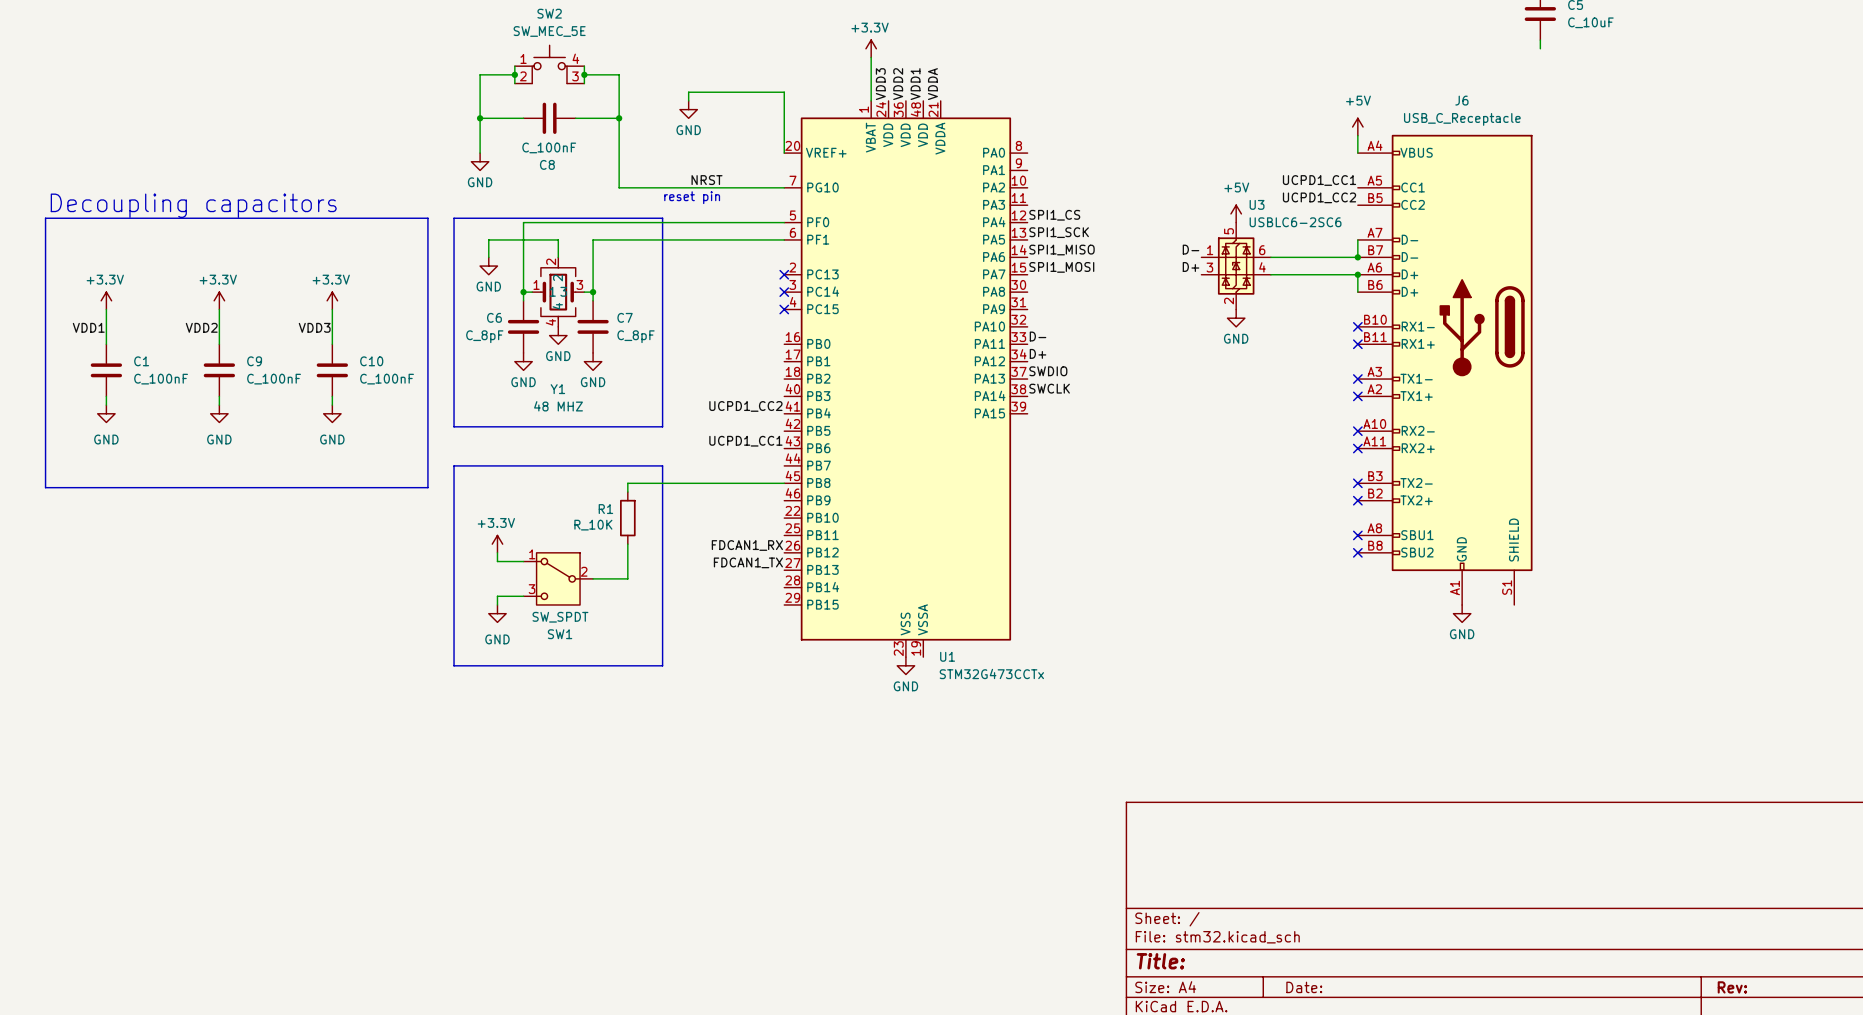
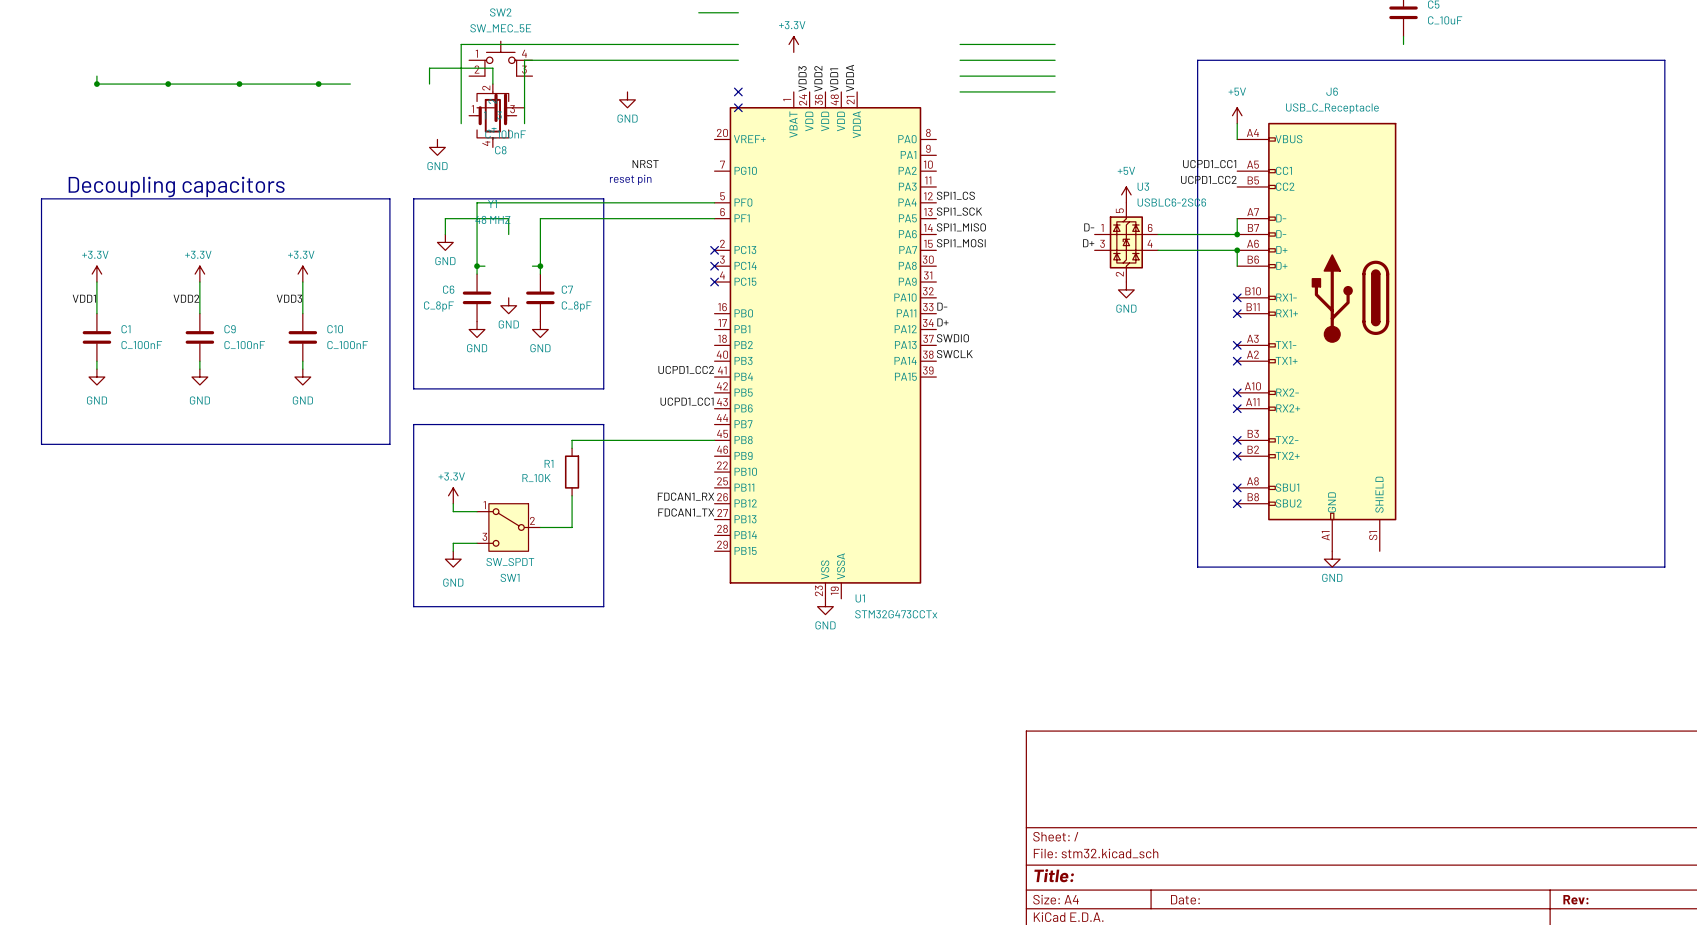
wire: none -> (698, 12) (738, 12)
wire: none -> (738, 44) (461, 44) (461, 123)
wire: none -> (960, 44) (1055, 44)
wire: (871, 57) (871, 100) -> none
wire: (514, 66) (514, 83) -> none
wire: (584, 66) (584, 83) -> none
wire: none -> (738, 60) (524, 60) (524, 123)
wire: none -> (960, 60) (1055, 60)
line: none -> (1197, 60) (1664, 60) (1664, 567) (1197, 567) (1197, 60)
wire: (480, 74) (480, 153) -> (437, 68) (429, 68) (429, 84)
wire: none -> (469, 68) (492, 68) (492, 84)
junction: (514, 74) -> none
wire: (584, 74) (619, 74) (619, 187) (784, 187) -> none
junction: (584, 74) -> none
wire: none -> (96, 76) (96, 84) (350, 84)
wire: none -> (960, 76) (1055, 76)
junction: none -> (96, 84)
junction: none -> (168, 84)
junction: none -> (239, 84)
junction: none -> (318, 84)
wire: (688, 100) (688, 92) (784, 92) (784, 153) -> none
no-connect mark: none -> (738, 91)
wire: none -> (960, 91) (1055, 91)
wire: (480, 118) (523, 118) -> none
junction: (480, 118) -> none
wire: (575, 118) (619, 118) -> none
junction: (619, 118) -> none
no-connect mark: none -> (738, 107)
Y1 position: (558, 292) -> (492, 115)

